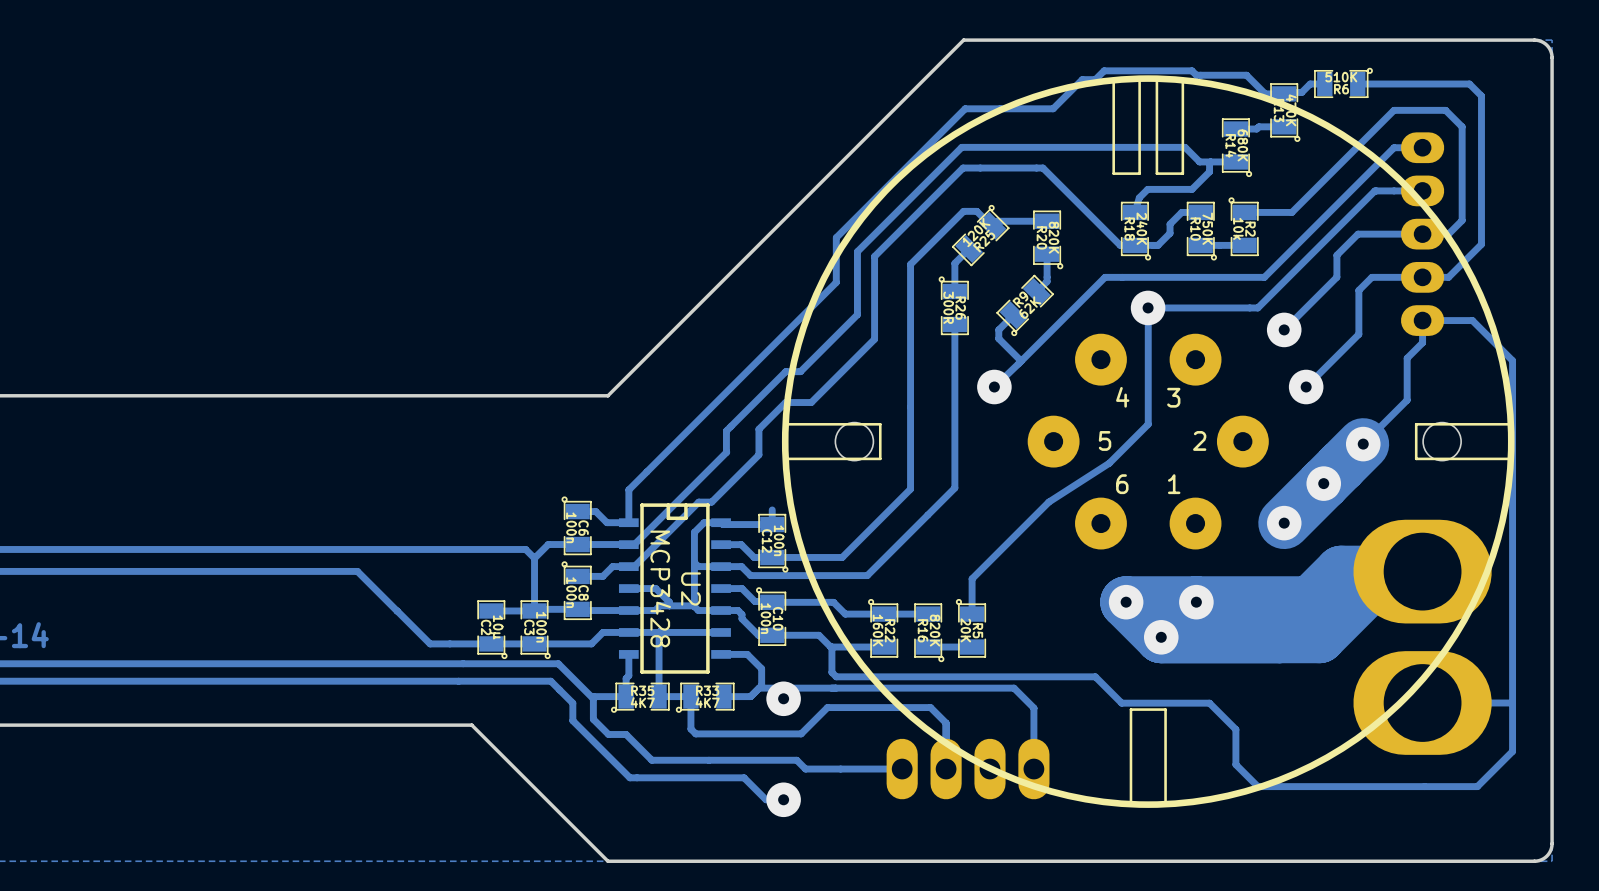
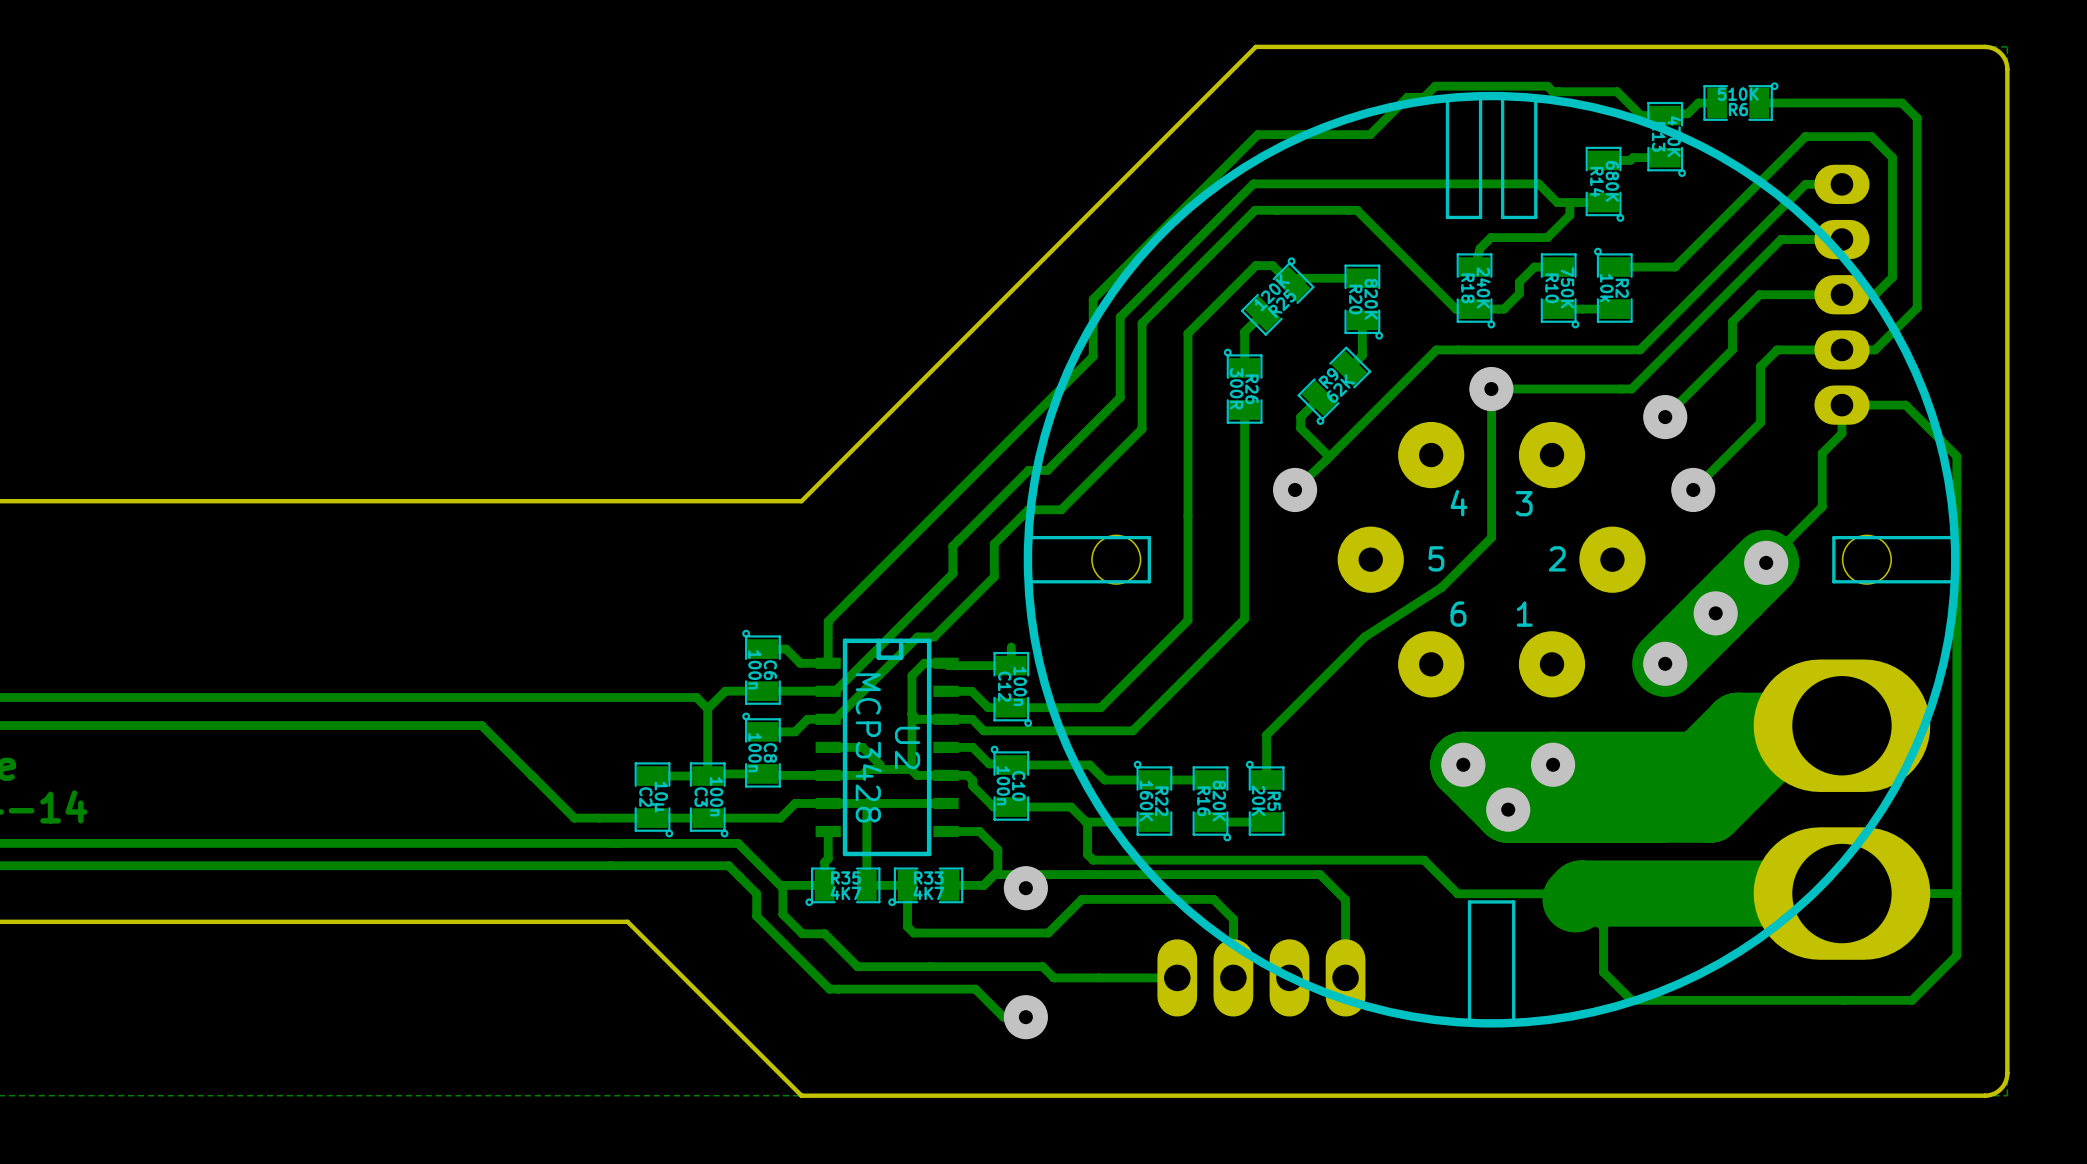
track: none -> (1841, 893) (1581, 893) (1575, 899)

